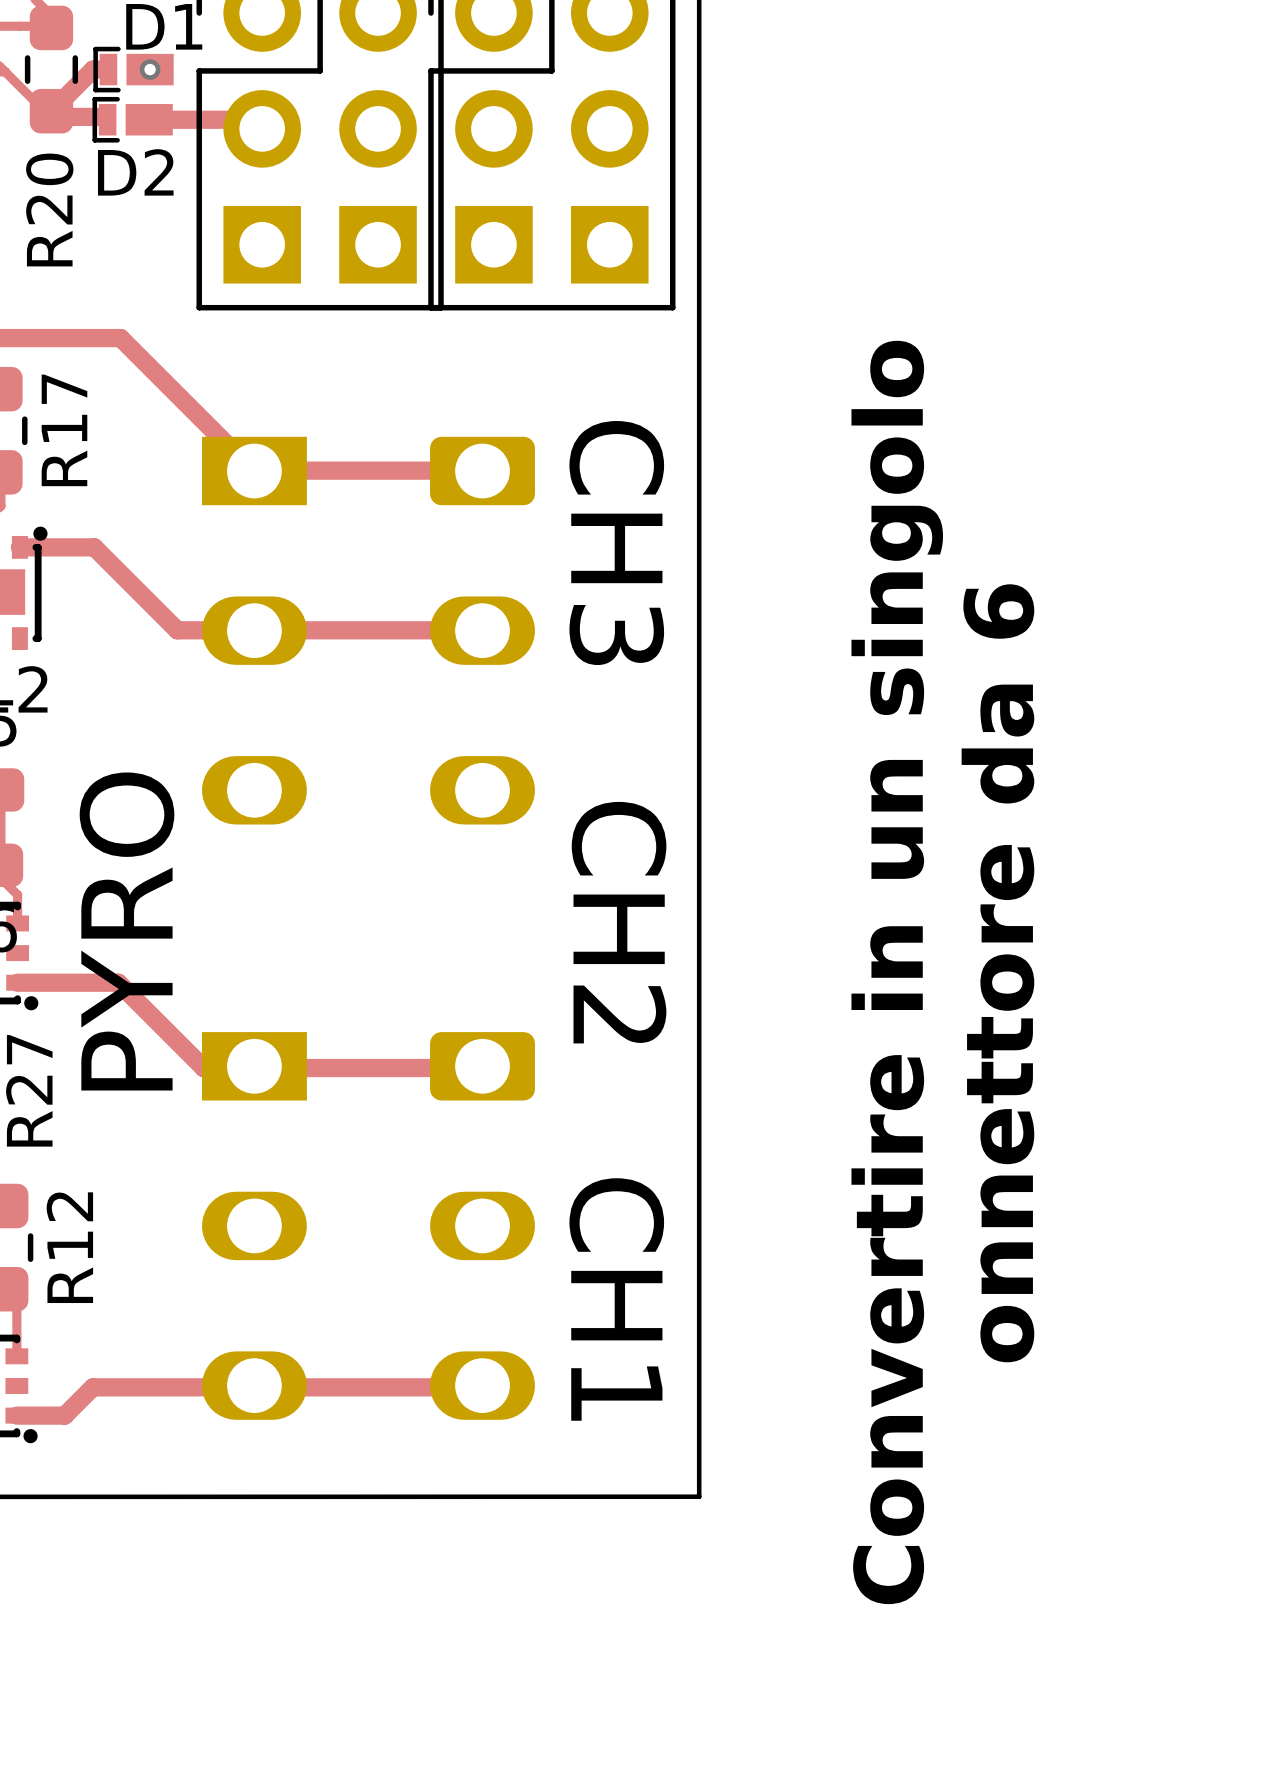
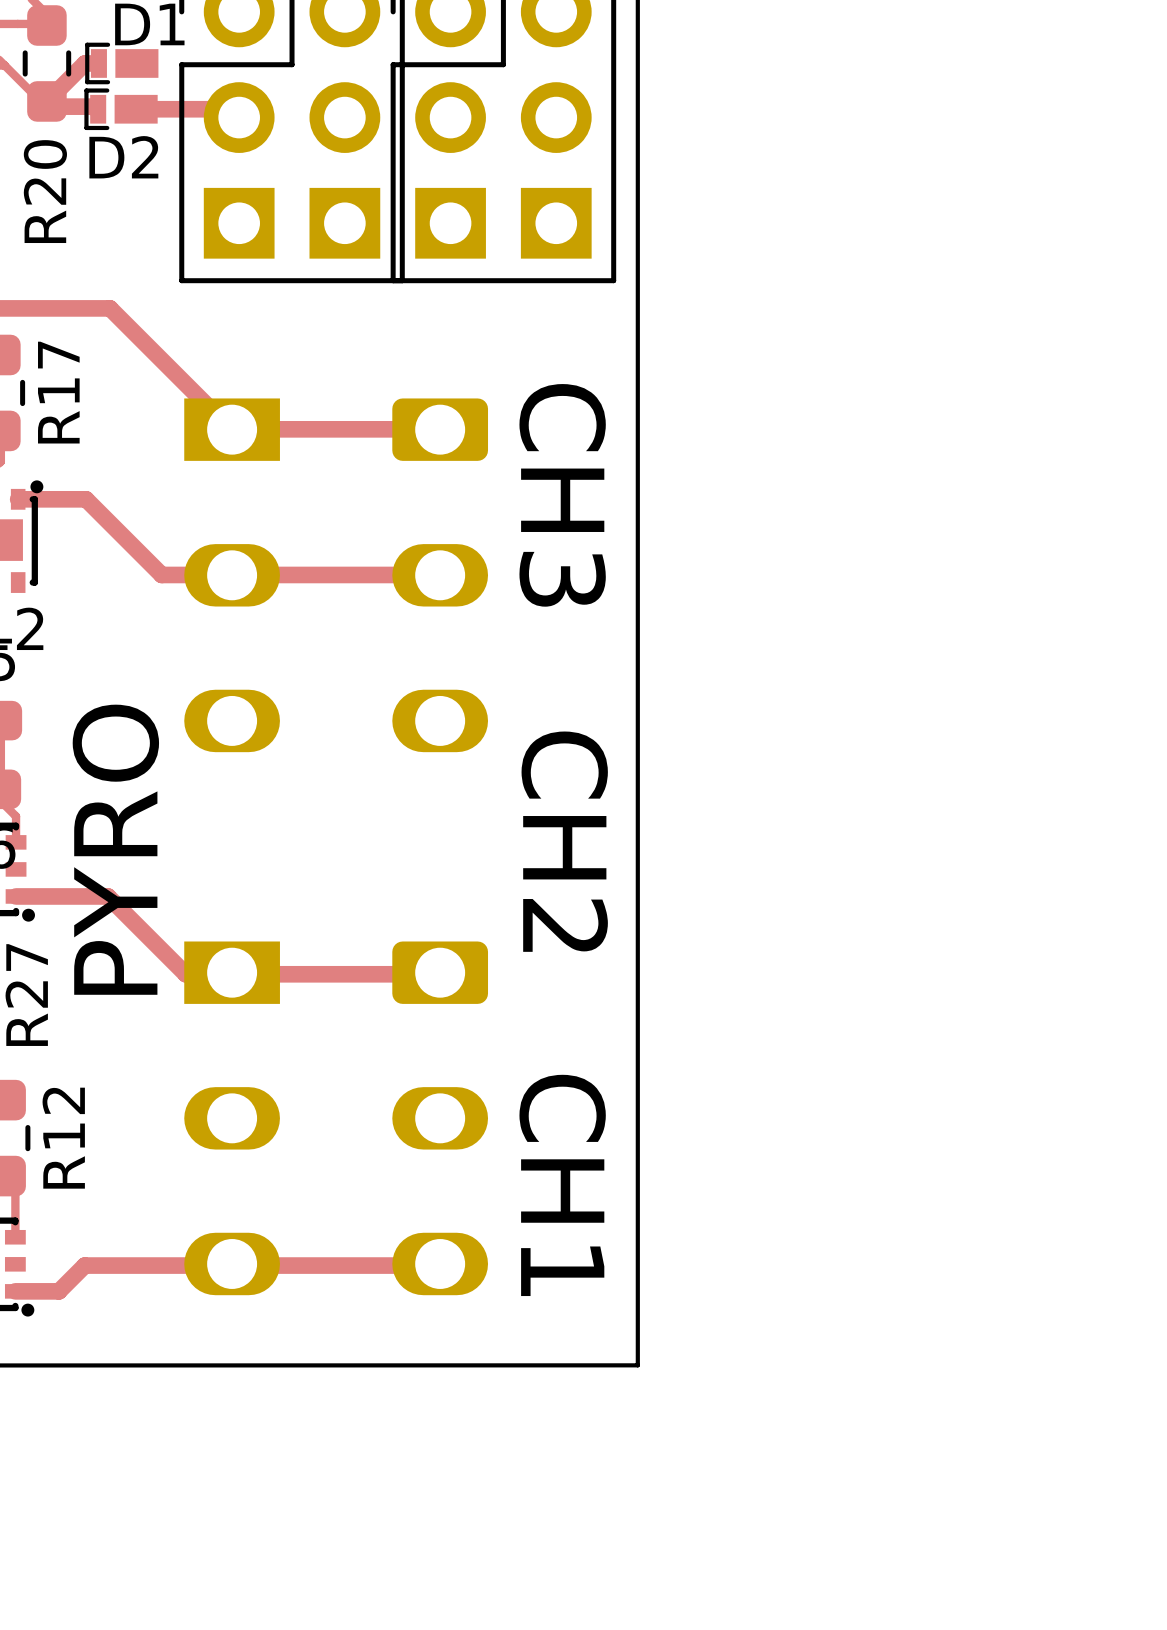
via: (150, 69) -> none
text: Convertire in un singolo (897, 972) -> none
text: onnettore da 6 (997, 973) -> none

